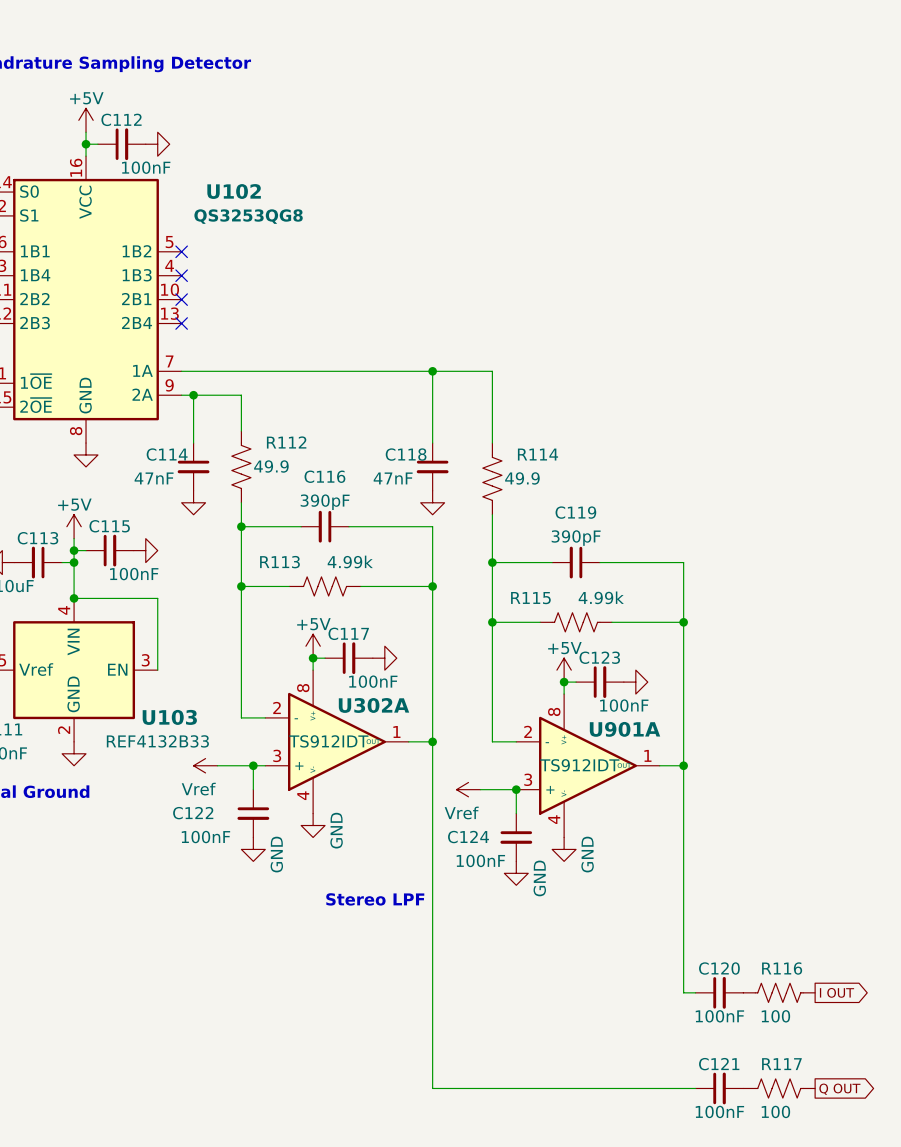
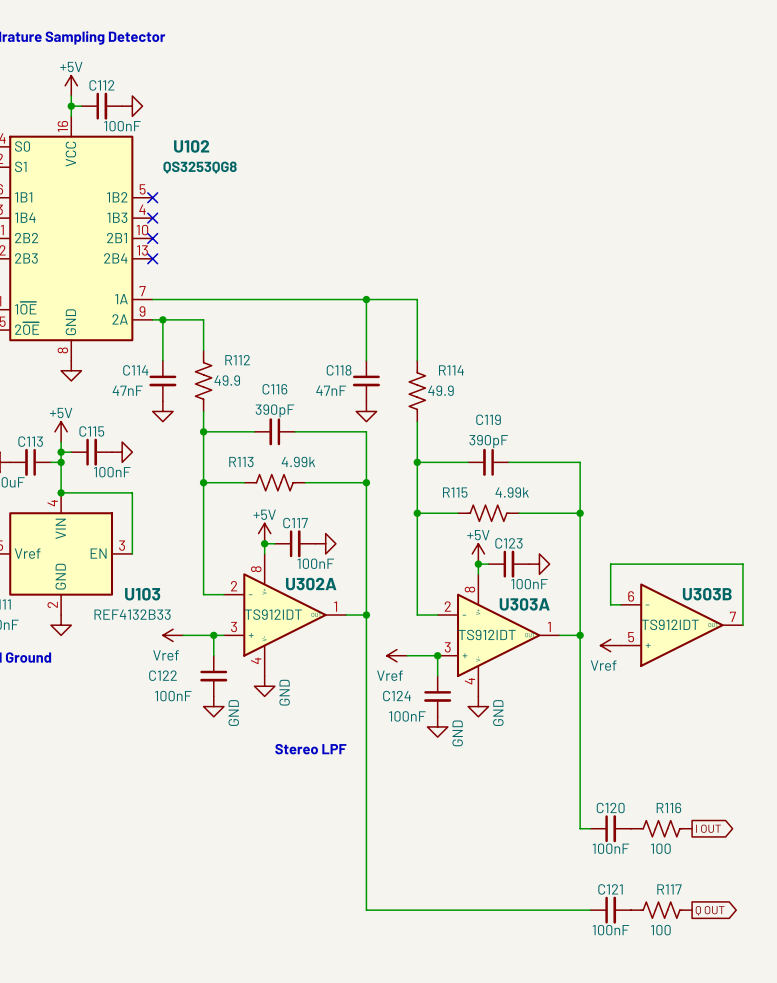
U901A name: U901A (625, 729) -> U303A (524, 604)
wire: none -> (620, 604) (610, 604) (610, 564) (742, 564) (742, 625)
U303B: none -> TS912IDT (681, 625)
power symbol: none -> Vref (610, 645)

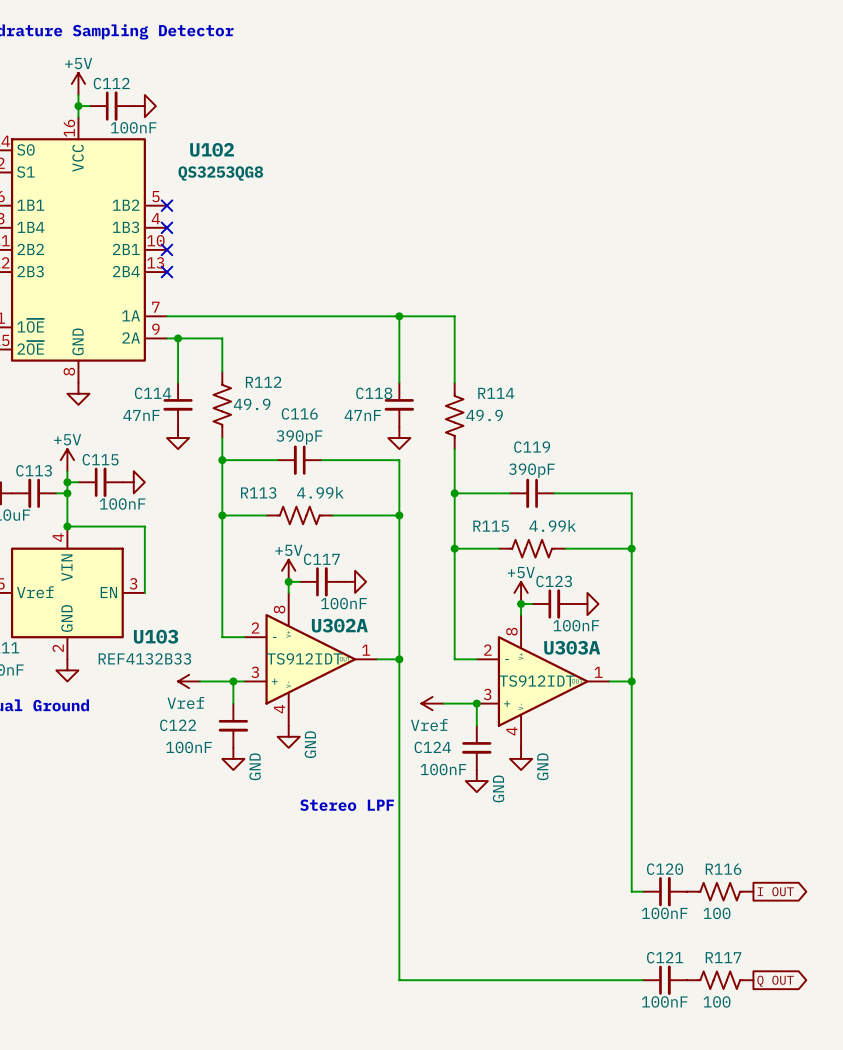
wire: (620, 604) (610, 604) (610, 564) (742, 564) (742, 625) -> none
U303B: TS912IDT (681, 625) -> none
power symbol: Vref (610, 645) -> none

